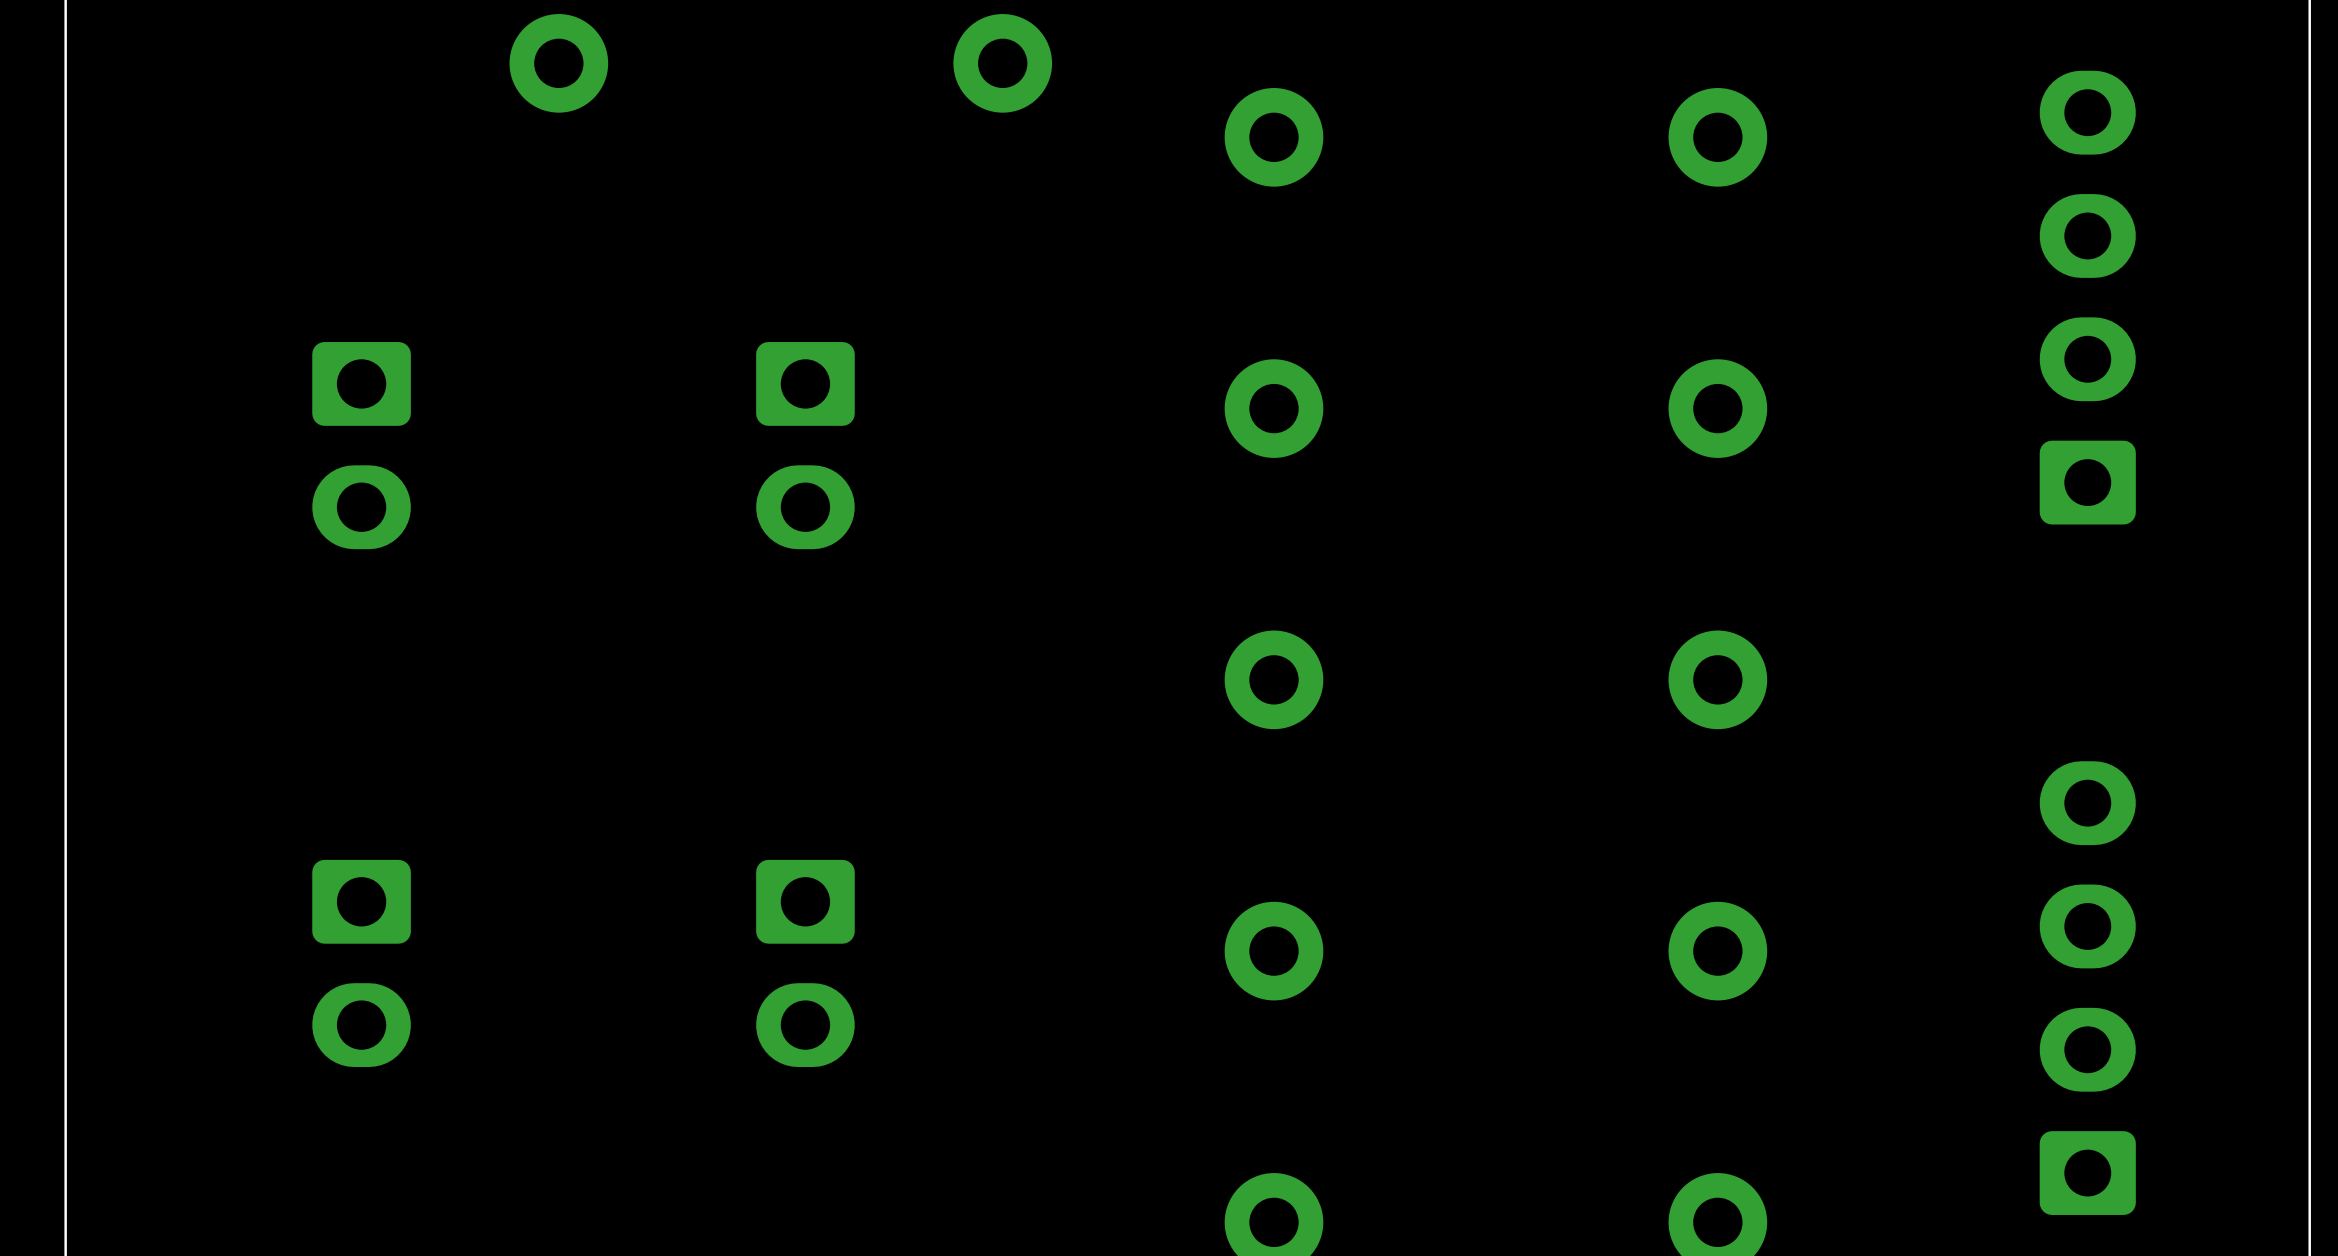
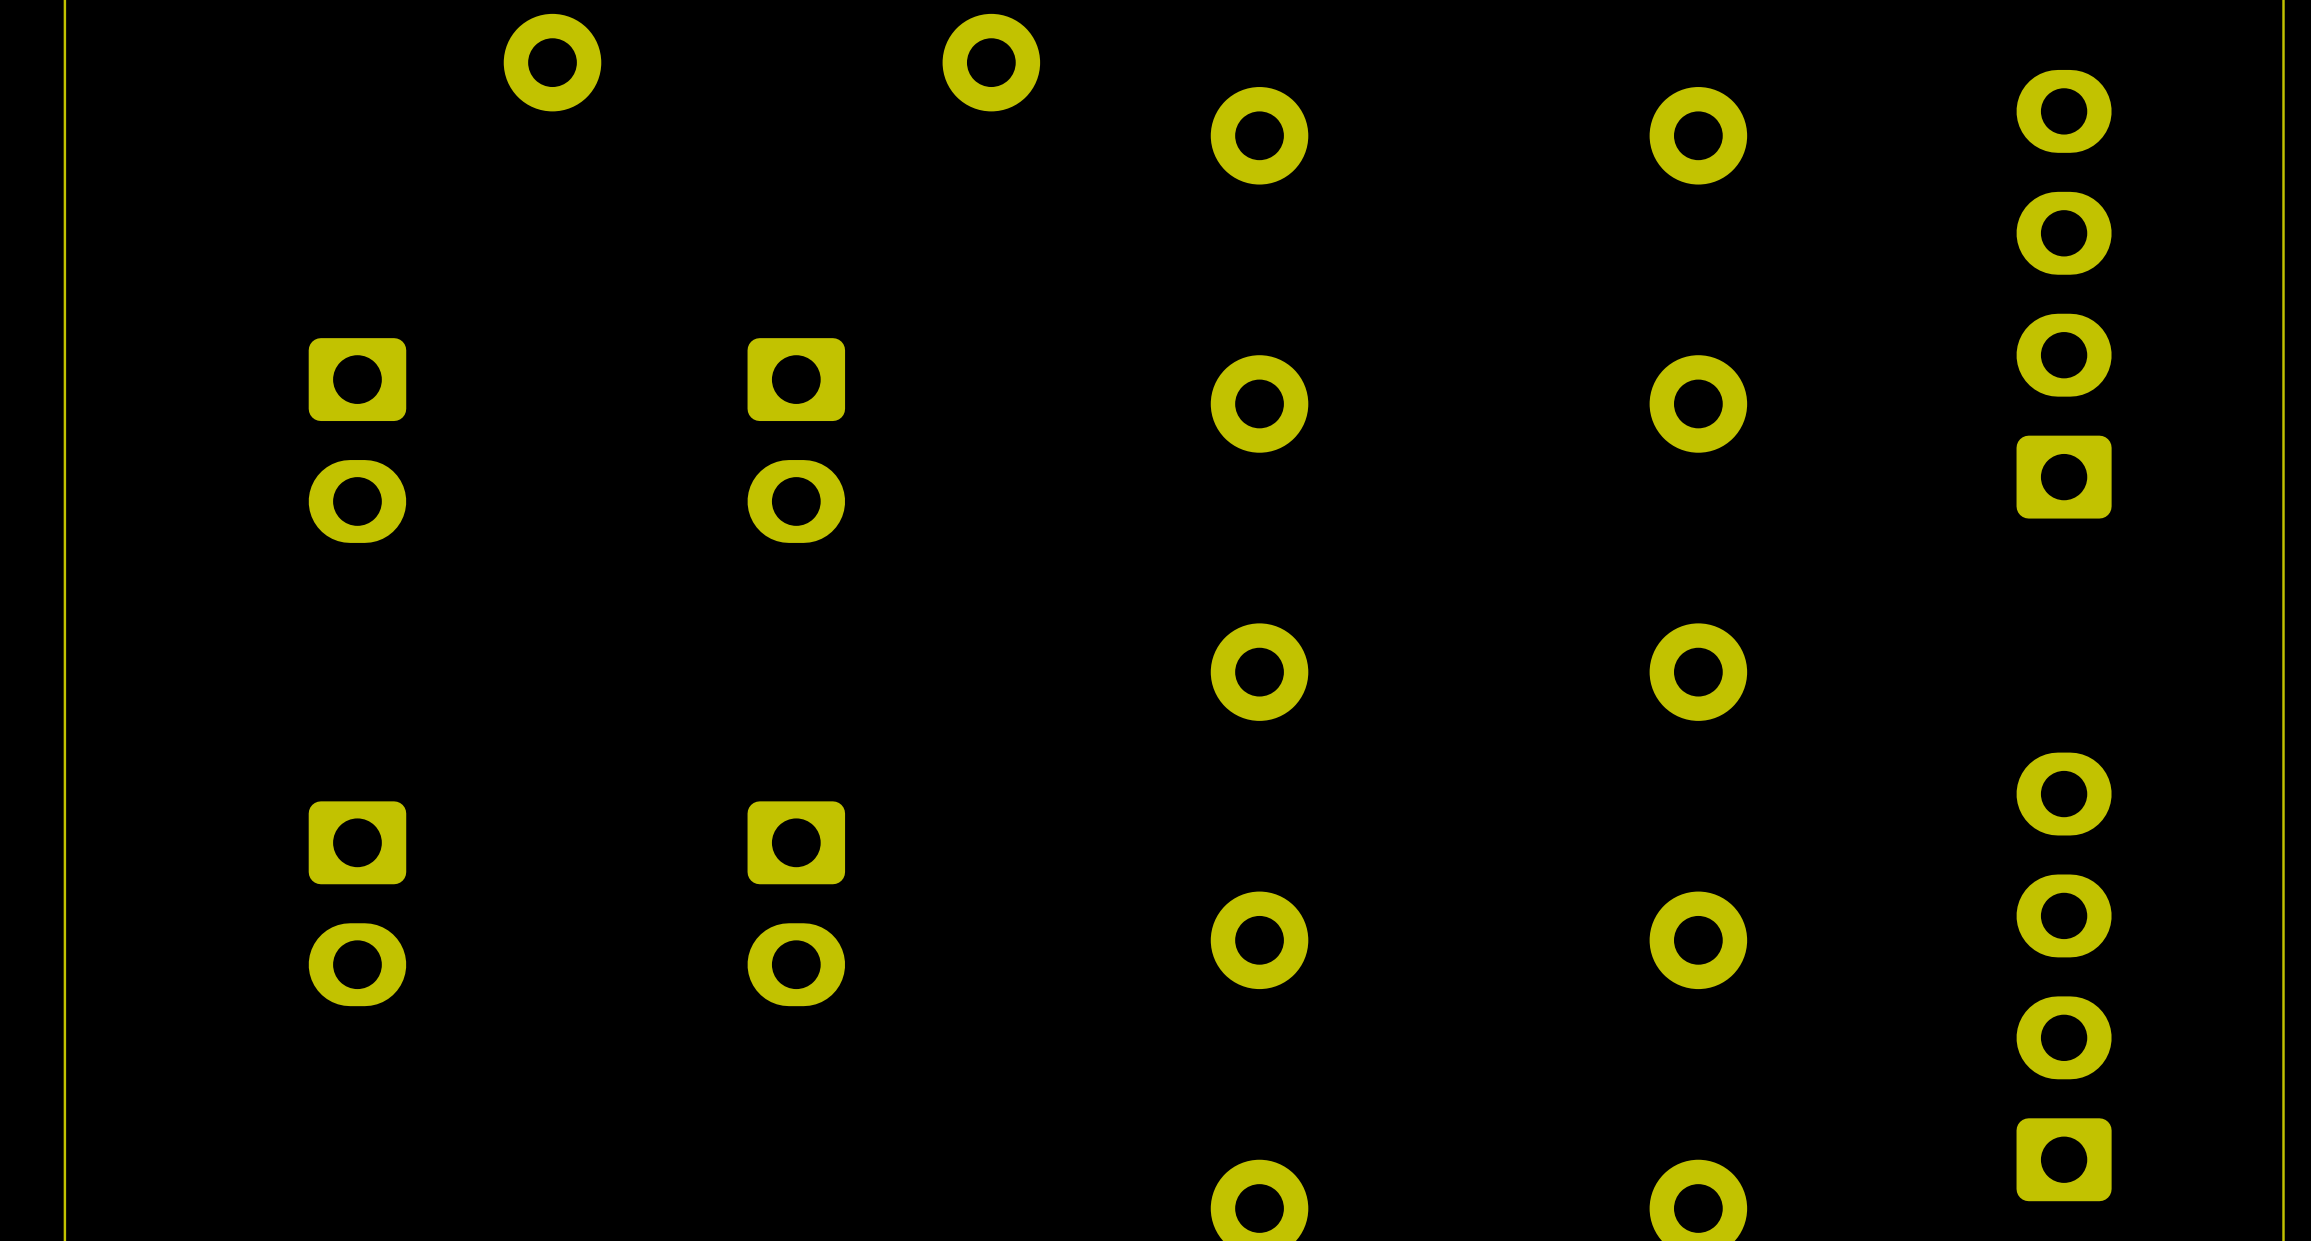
part position: (361, 963) -> (357, 903)
part position: (805, 963) -> (796, 903)

